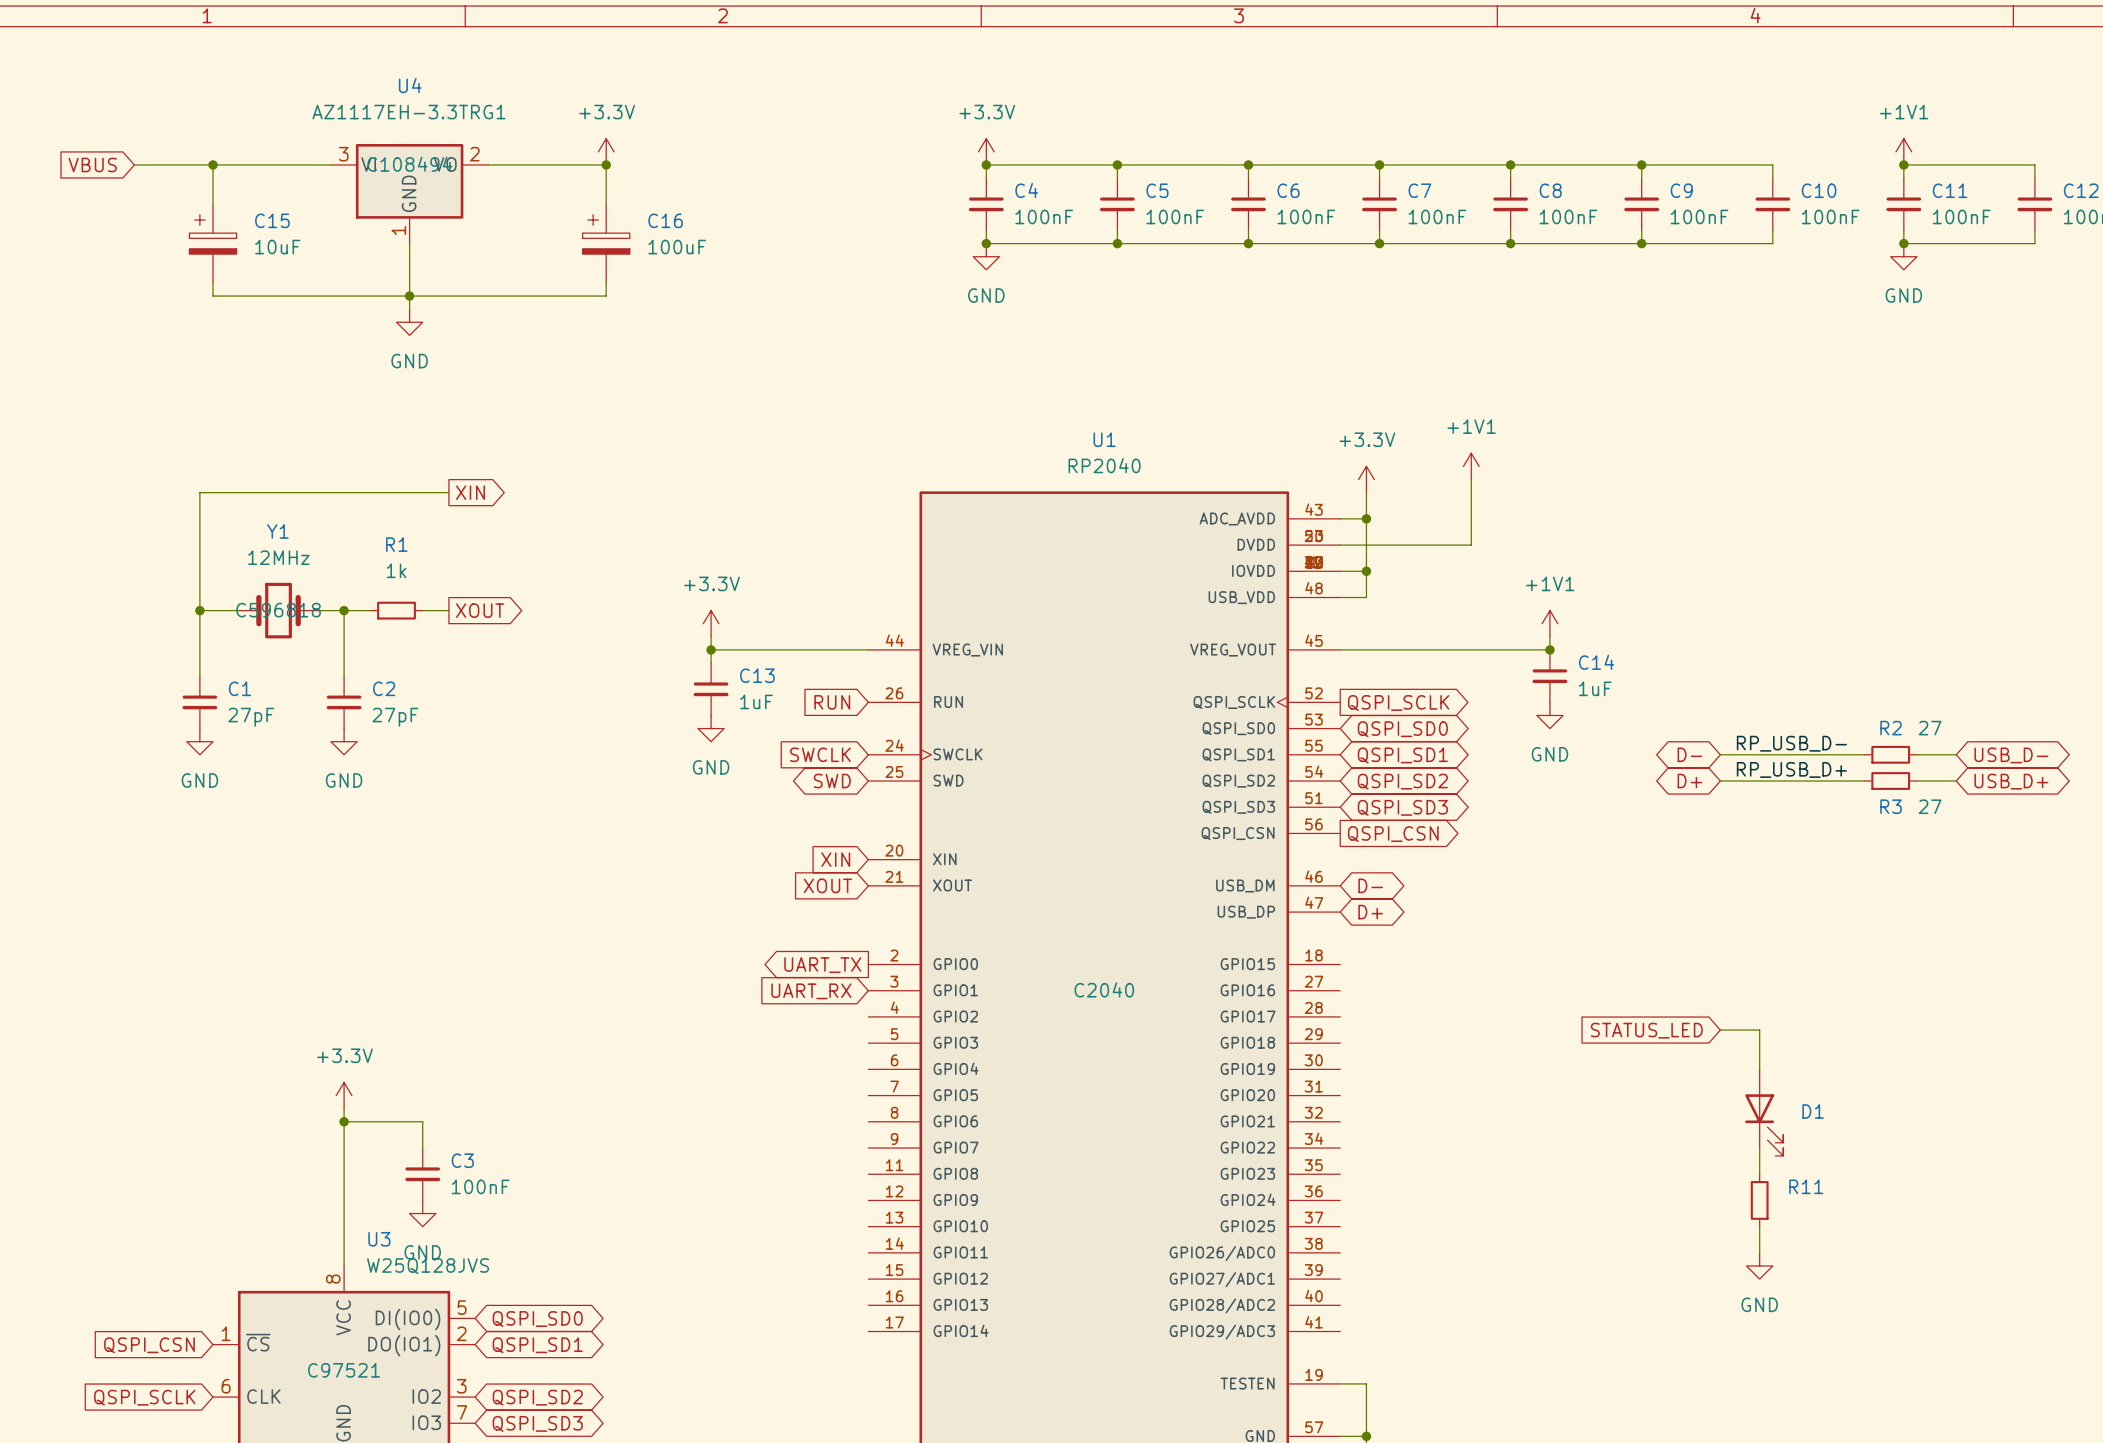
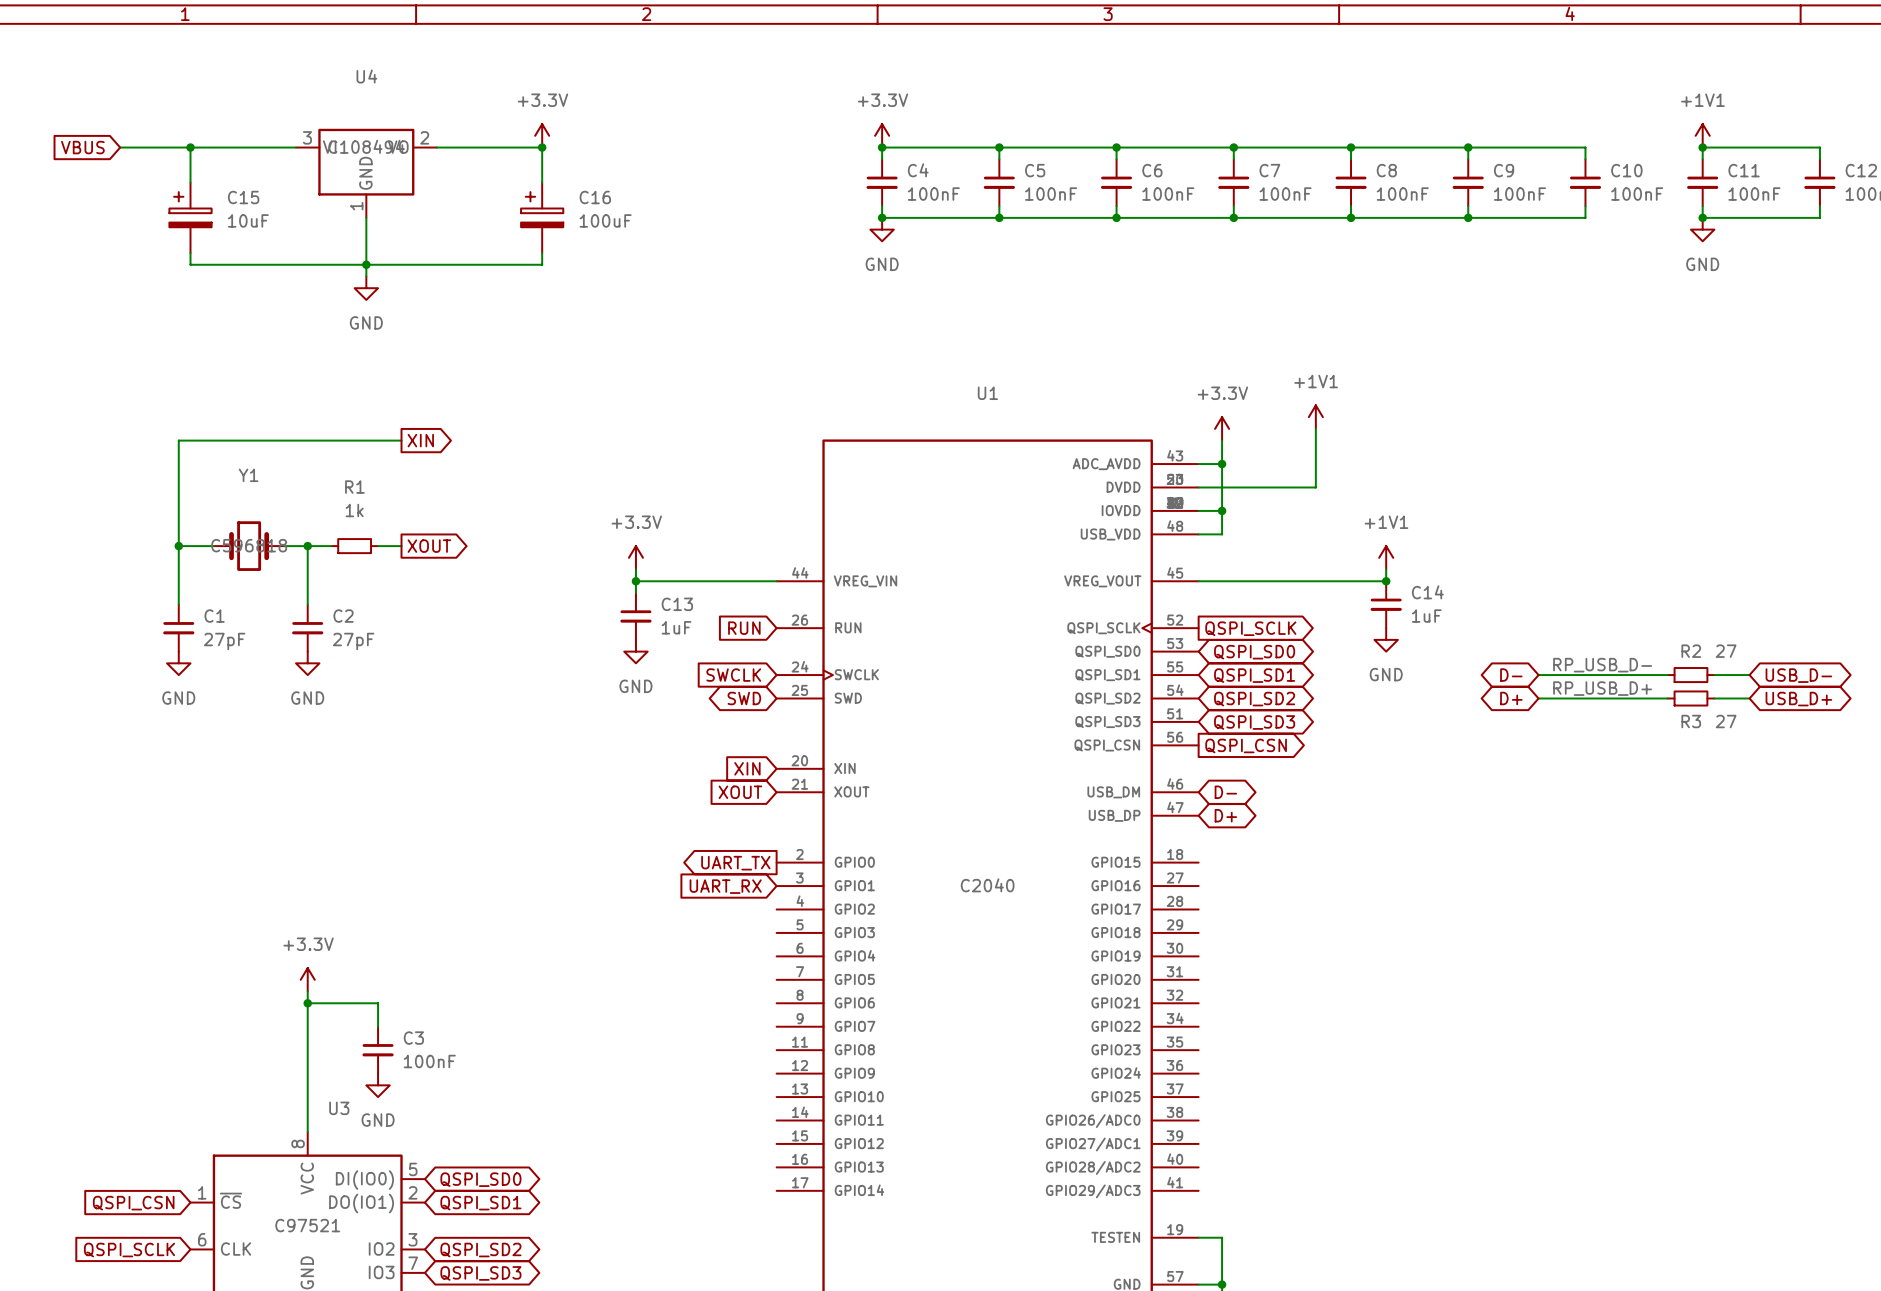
U4 value: AZ1117EH-3.3TRG1 (408, 112) -> none
U1 value: RP2040 (1104, 465) -> none
Y1 value: 12MHz (278, 557) -> none
global label: STATUS_LED (1646, 1030) -> none
wire: (1720, 1030) (1759, 1030) (1759, 1069) -> none
D1: (1764, 1112) -> none
wire: (1759, 1148) (1759, 1174) -> none
R11: (1759, 1200) -> none
wire: (1759, 1226) (1759, 1252) -> none
power symbol: GND (1759, 1265) -> none
U3 value: W25Q128JVS (428, 1266) -> none

